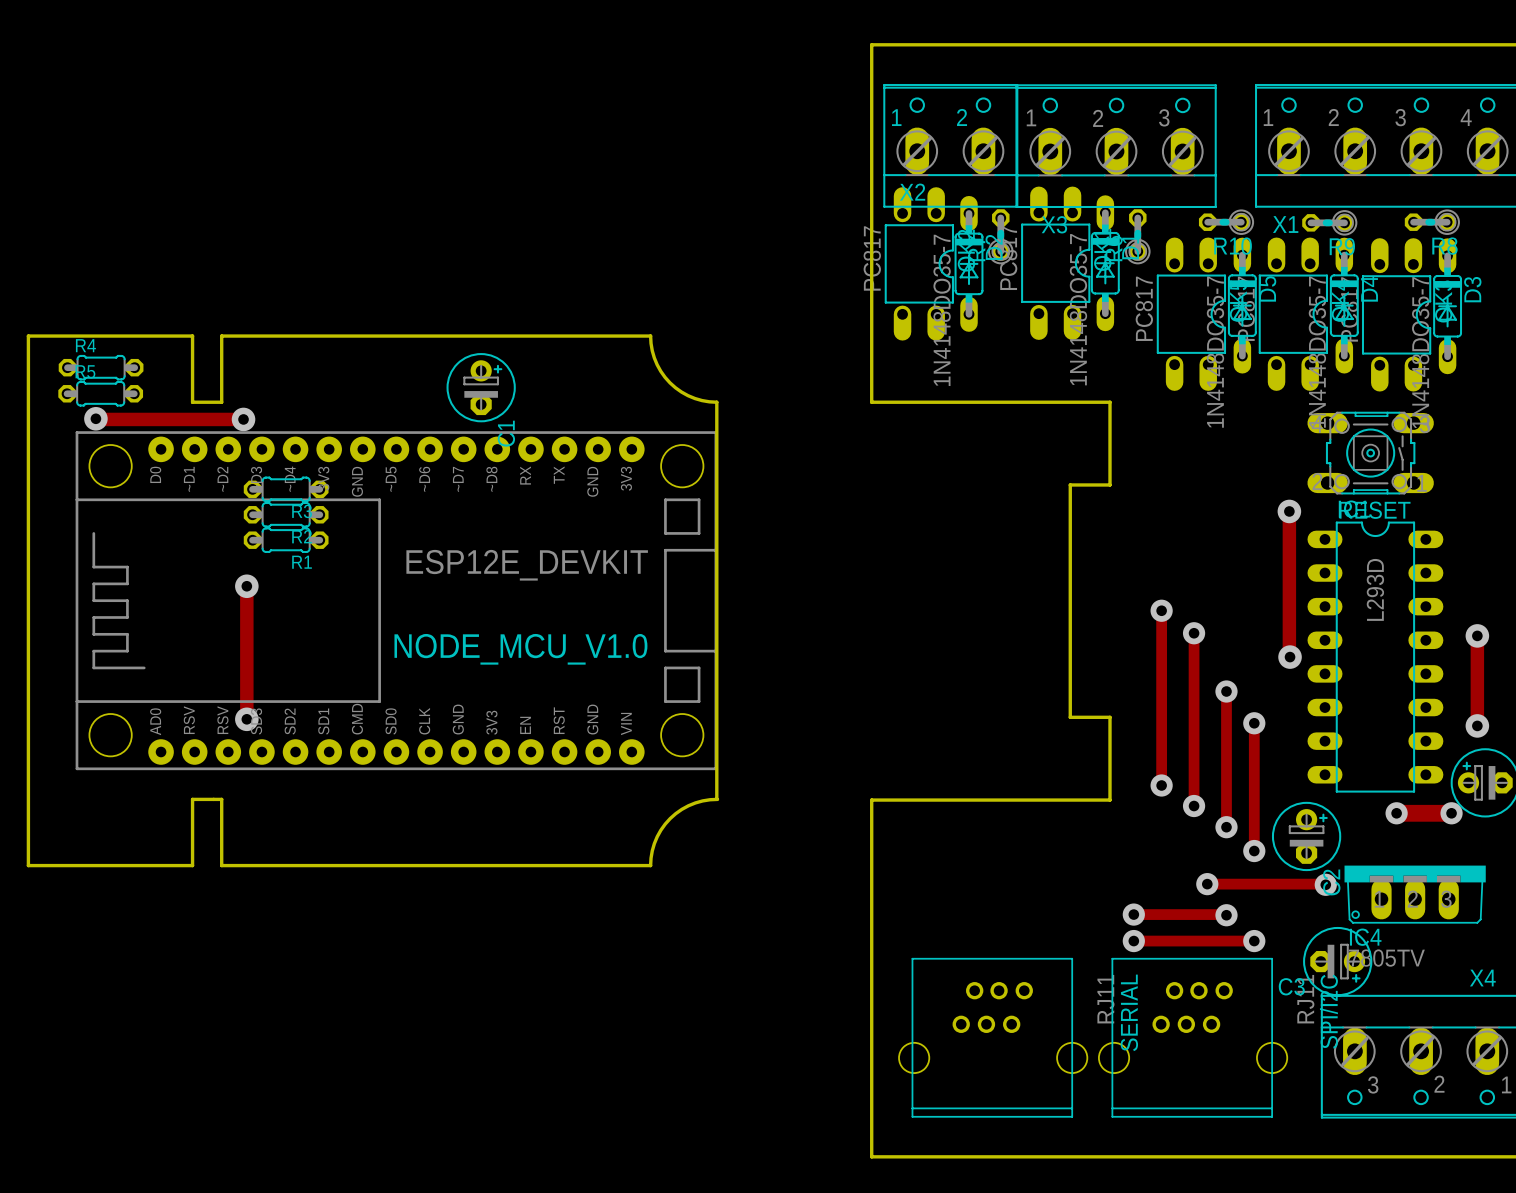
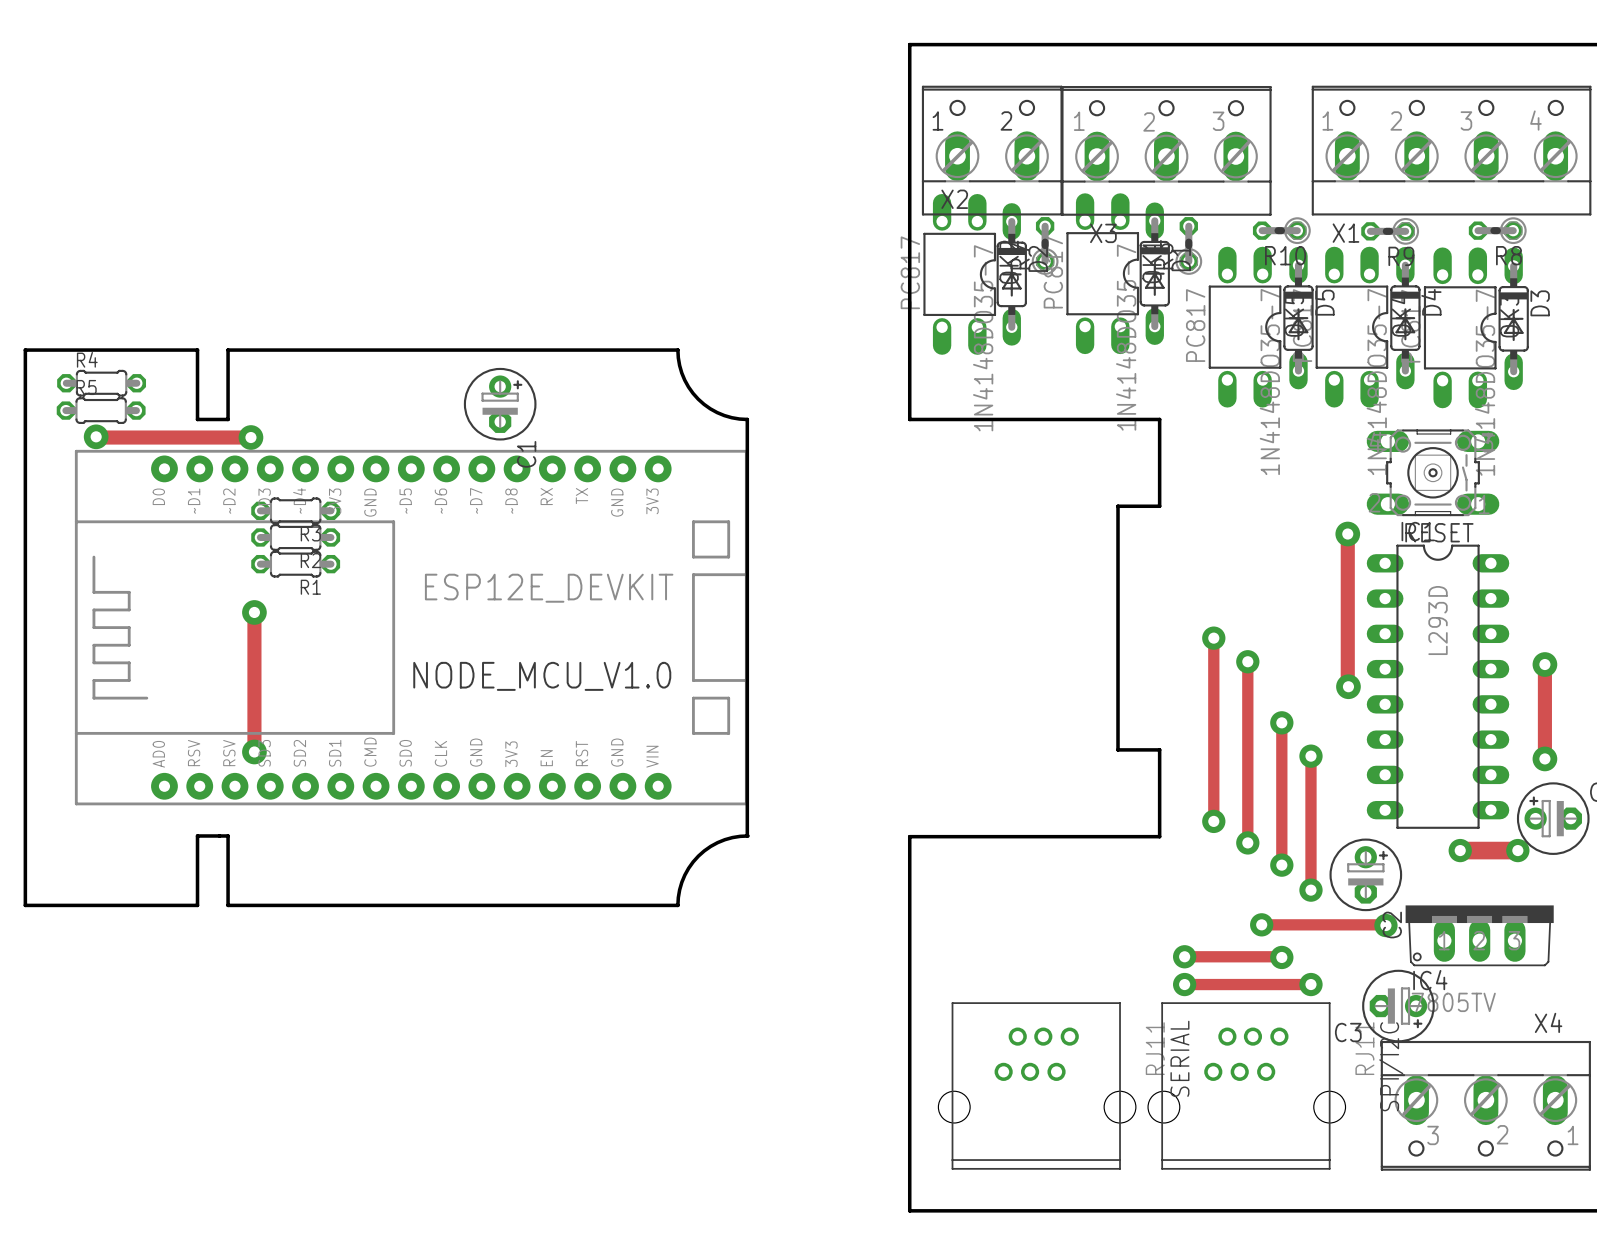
NODE_MCU_V1.0 footprint: [75, 431, 718, 771] -> [74, 449, 748, 806]

